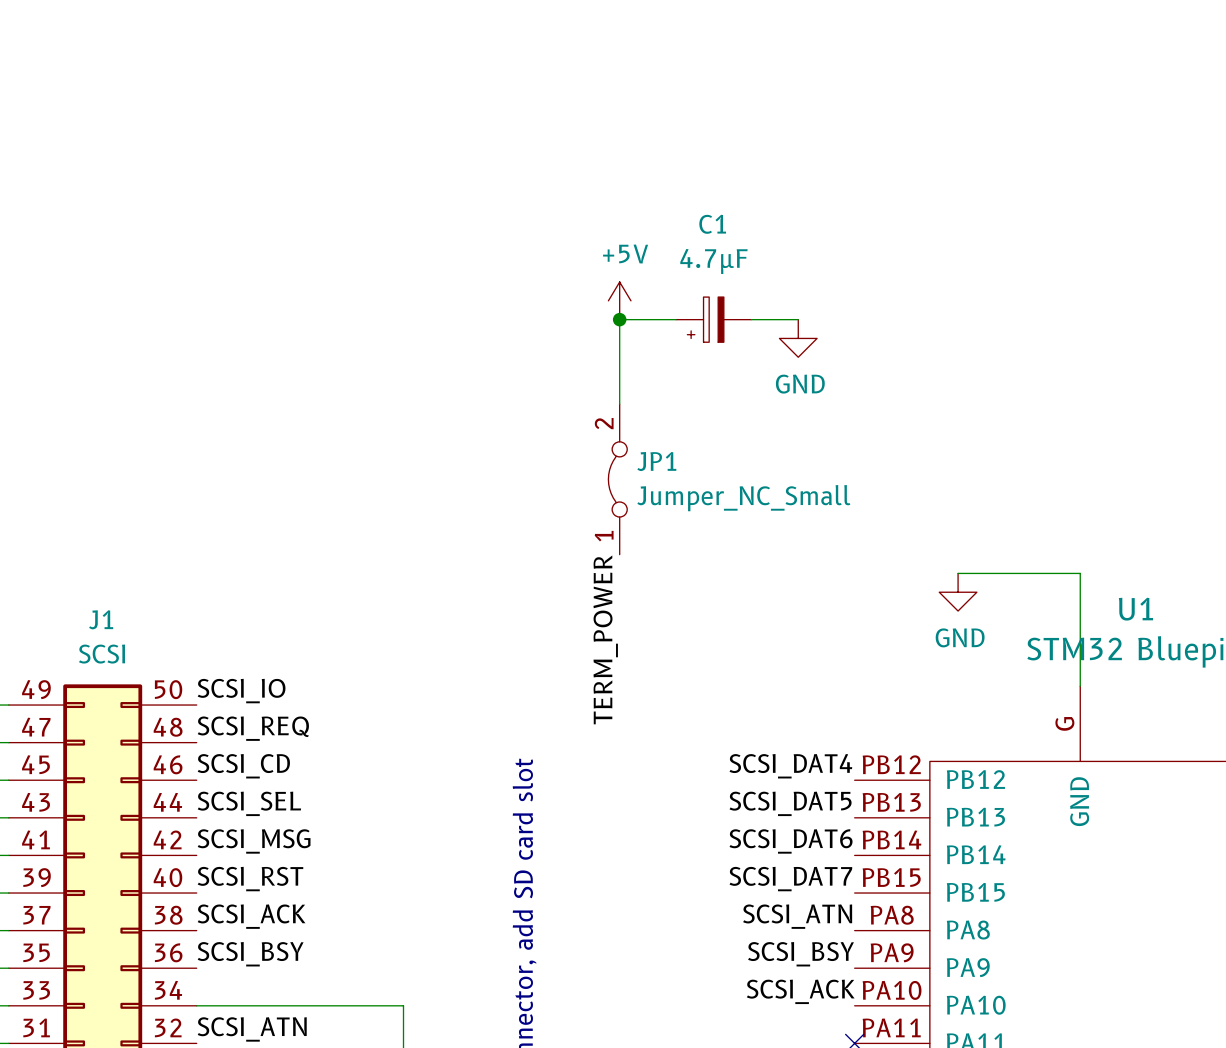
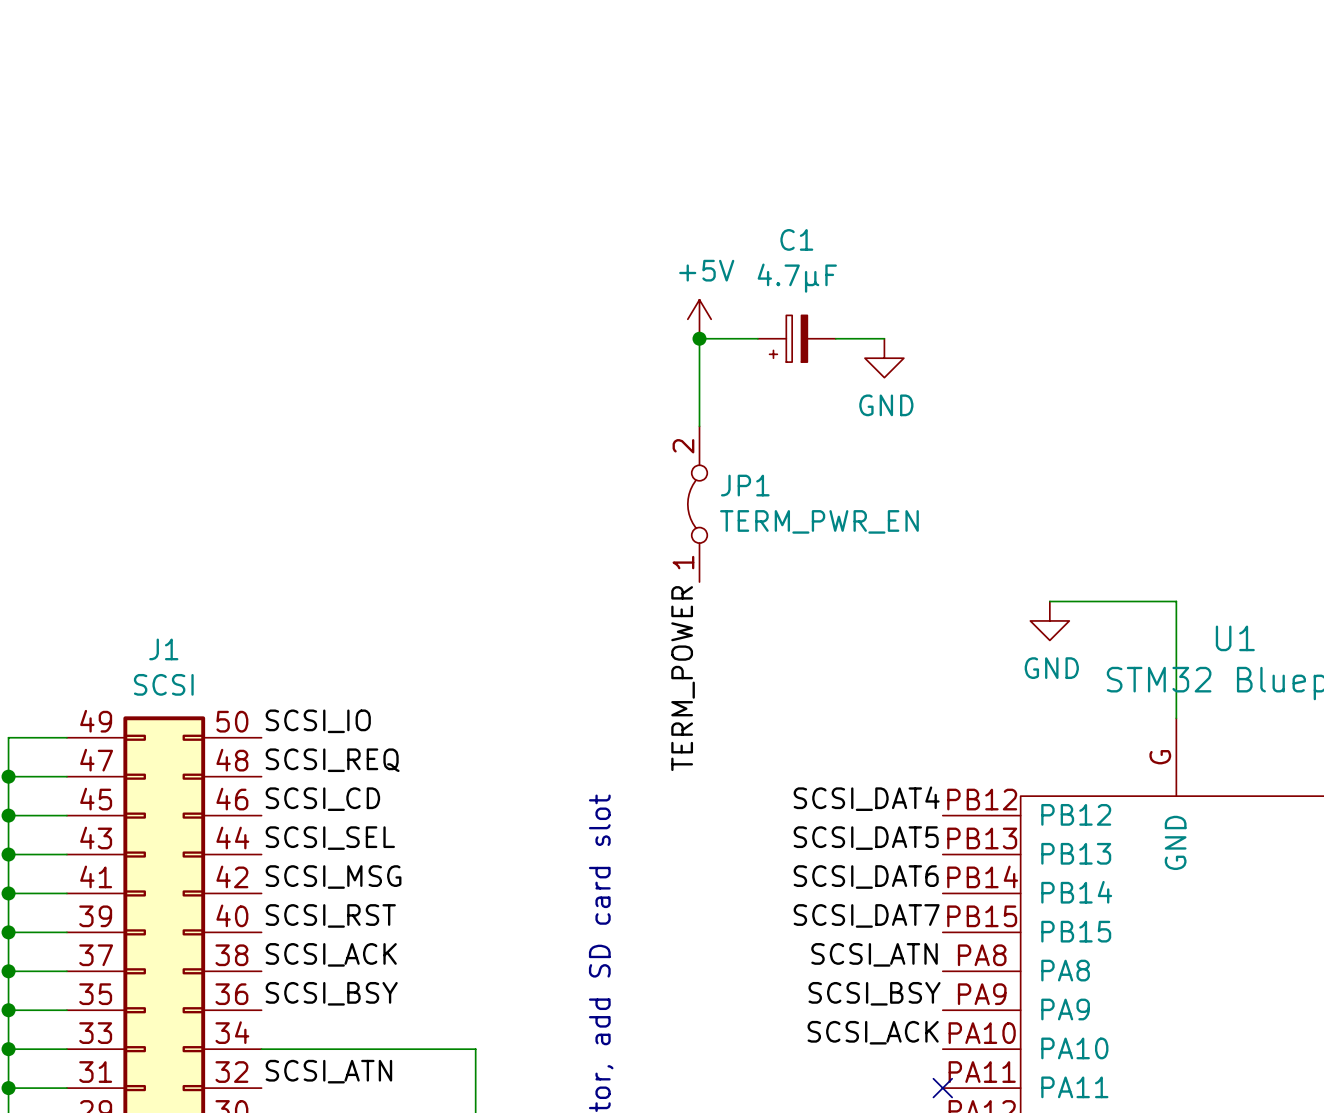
JP1 value: Jumper_NC_Small (743, 498) -> TERM_PWR_EN (819, 521)

